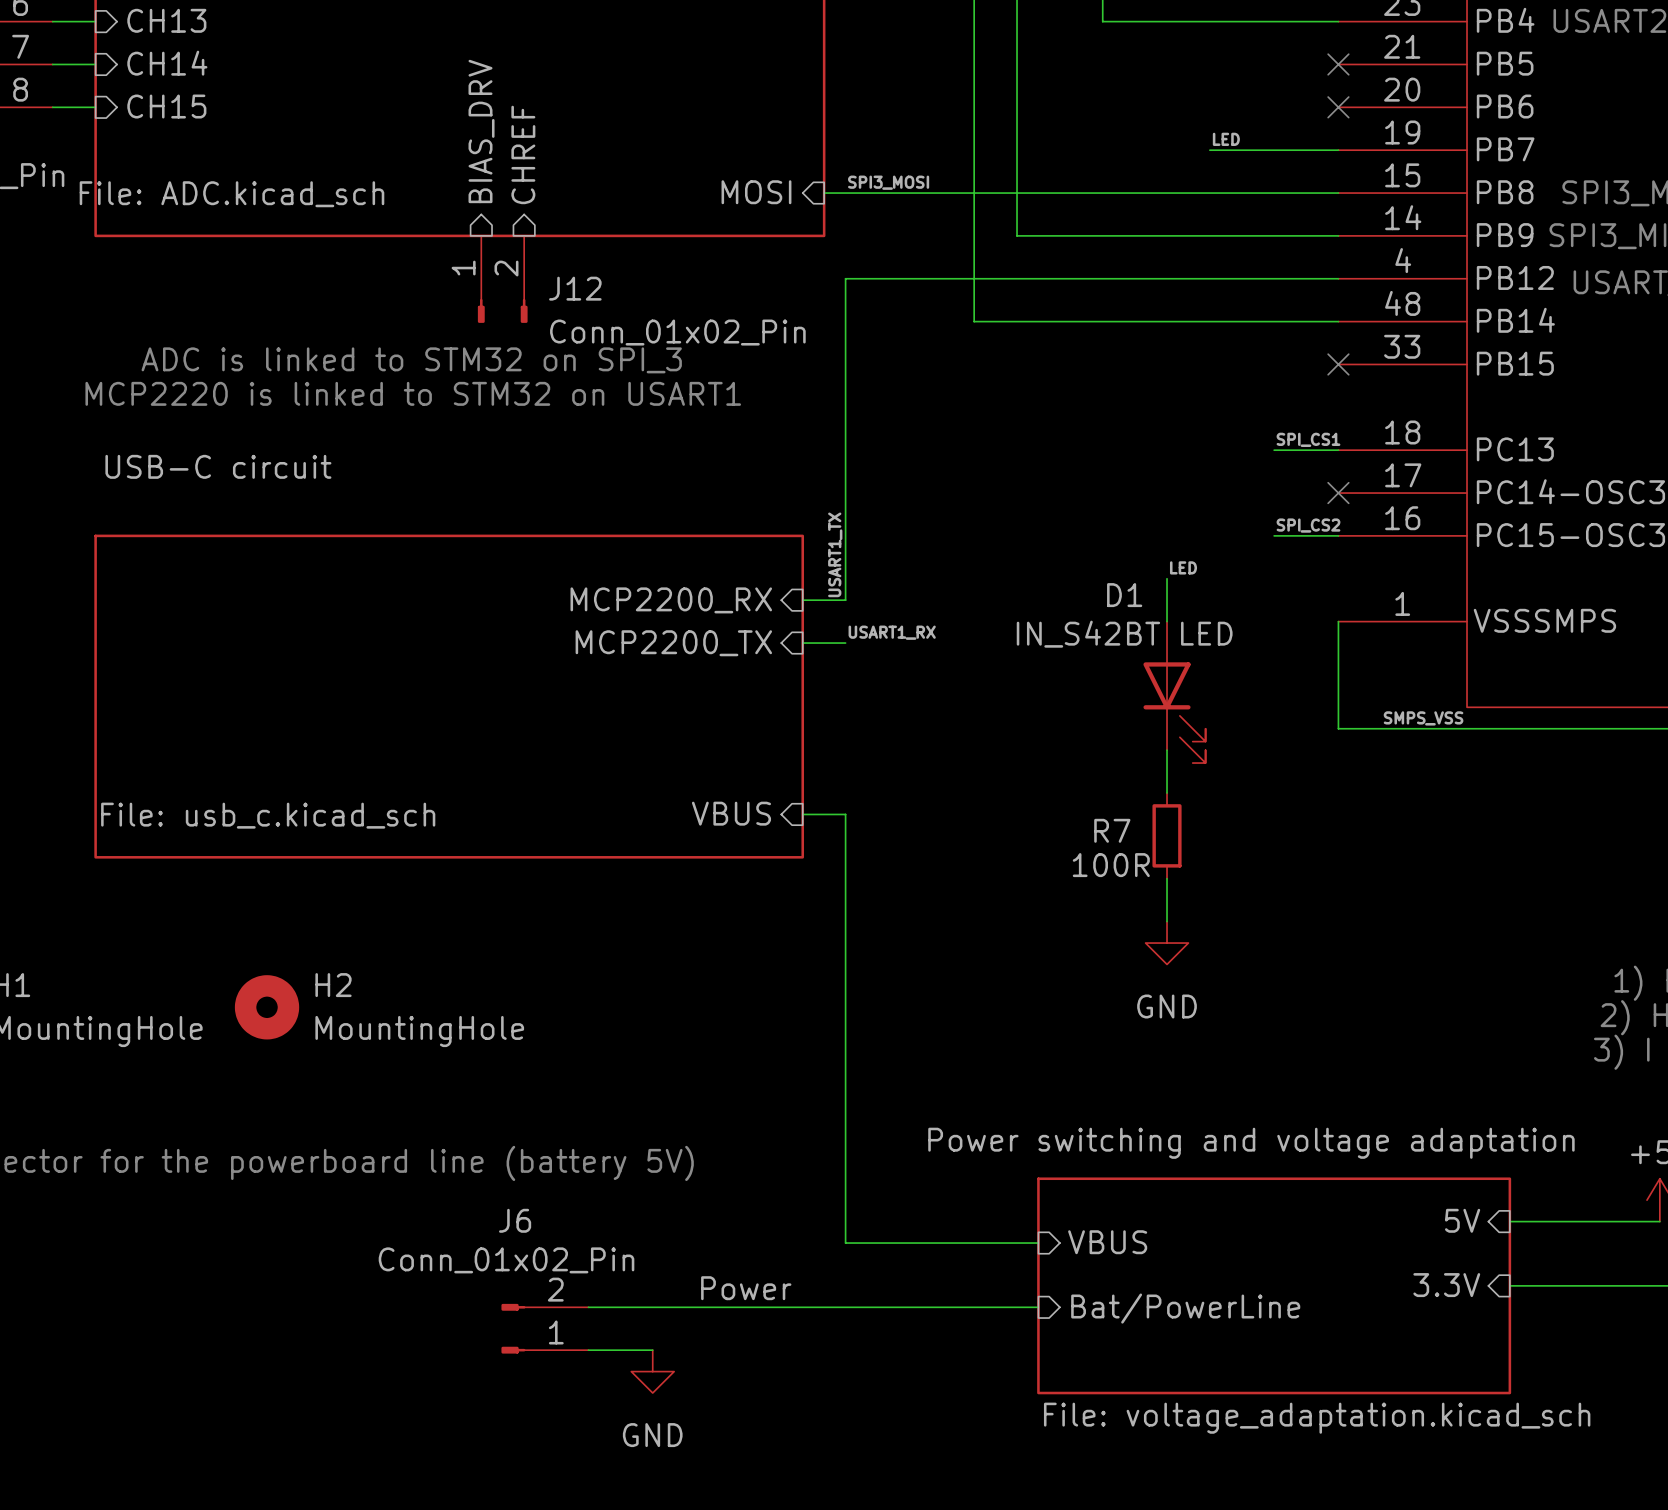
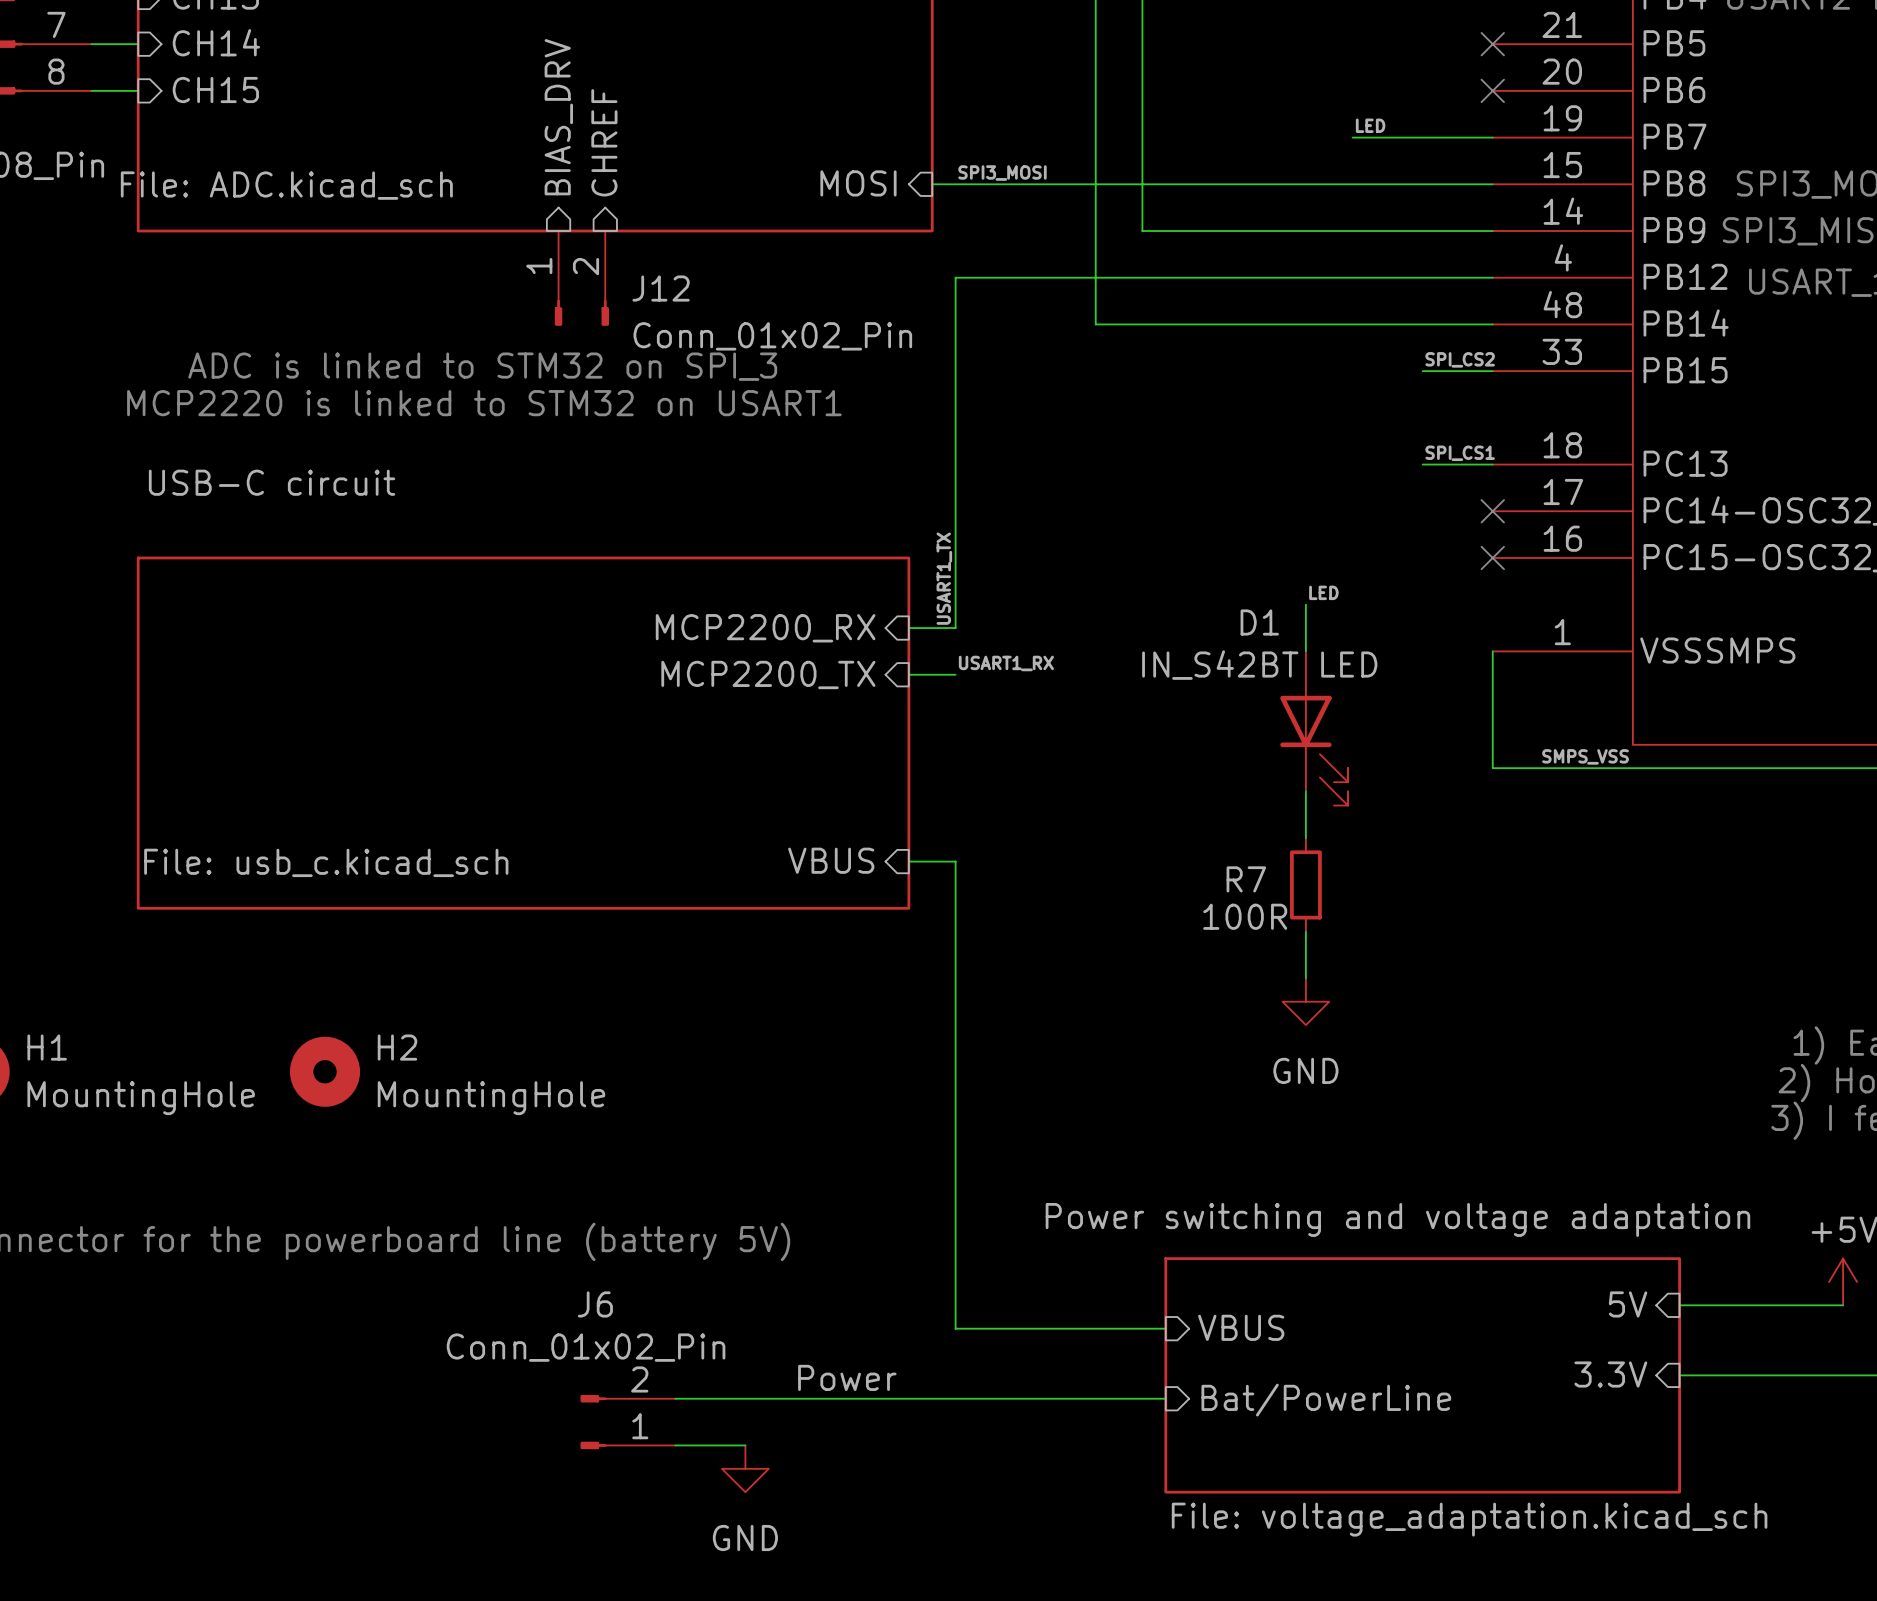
no-connect mark: (1338, 364) -> none
label position: SPI_CS2 (1308, 525) -> SPI_CS2 (1460, 359)
wire: (1274, 535) (1338, 535) -> (1422, 371) (1492, 371)
no-connect mark: none -> (1492, 557)

